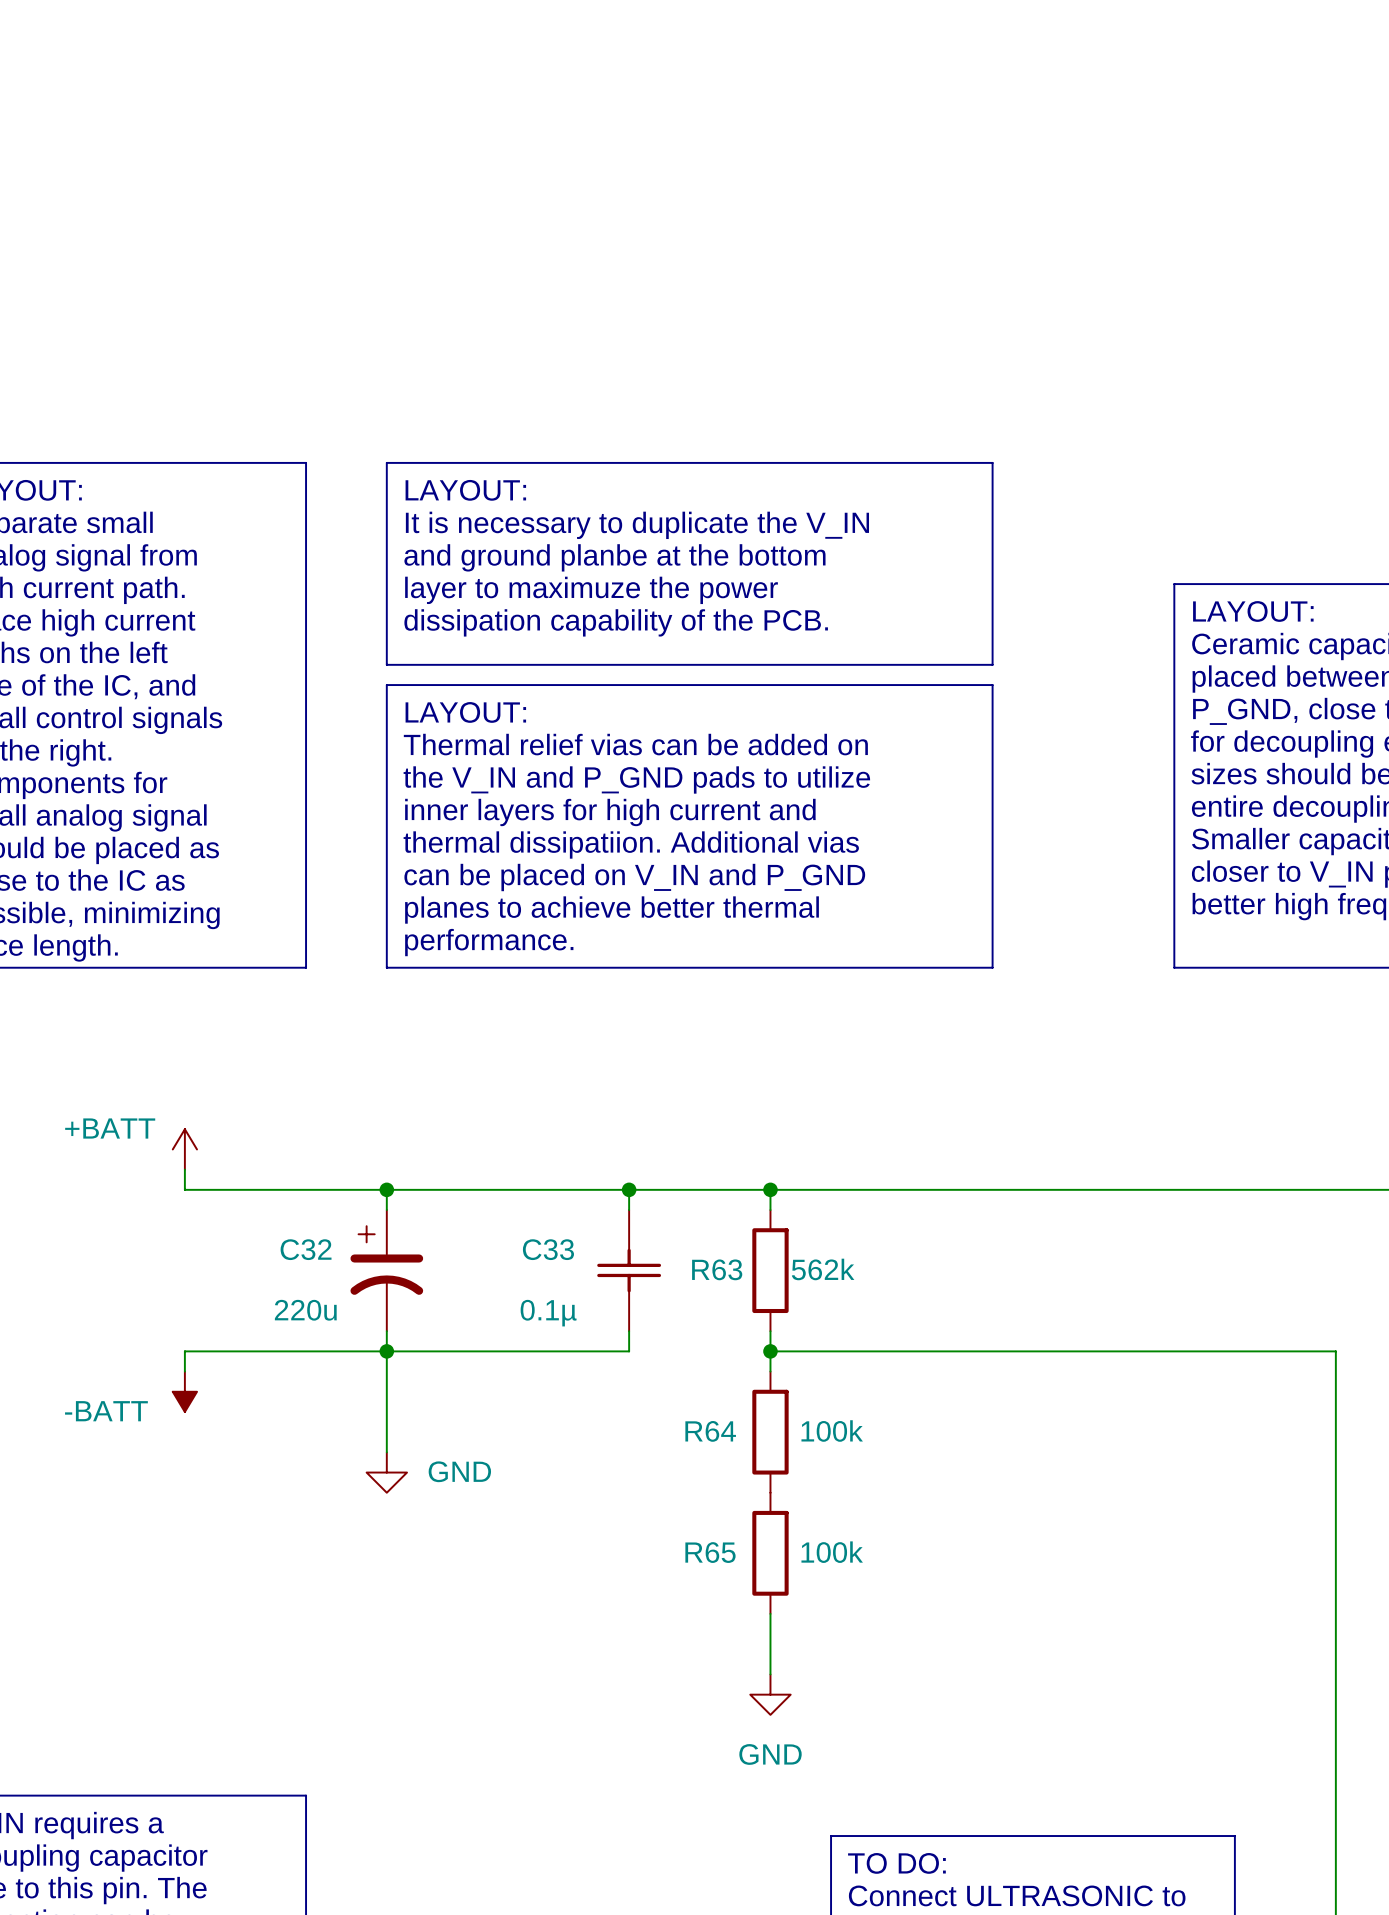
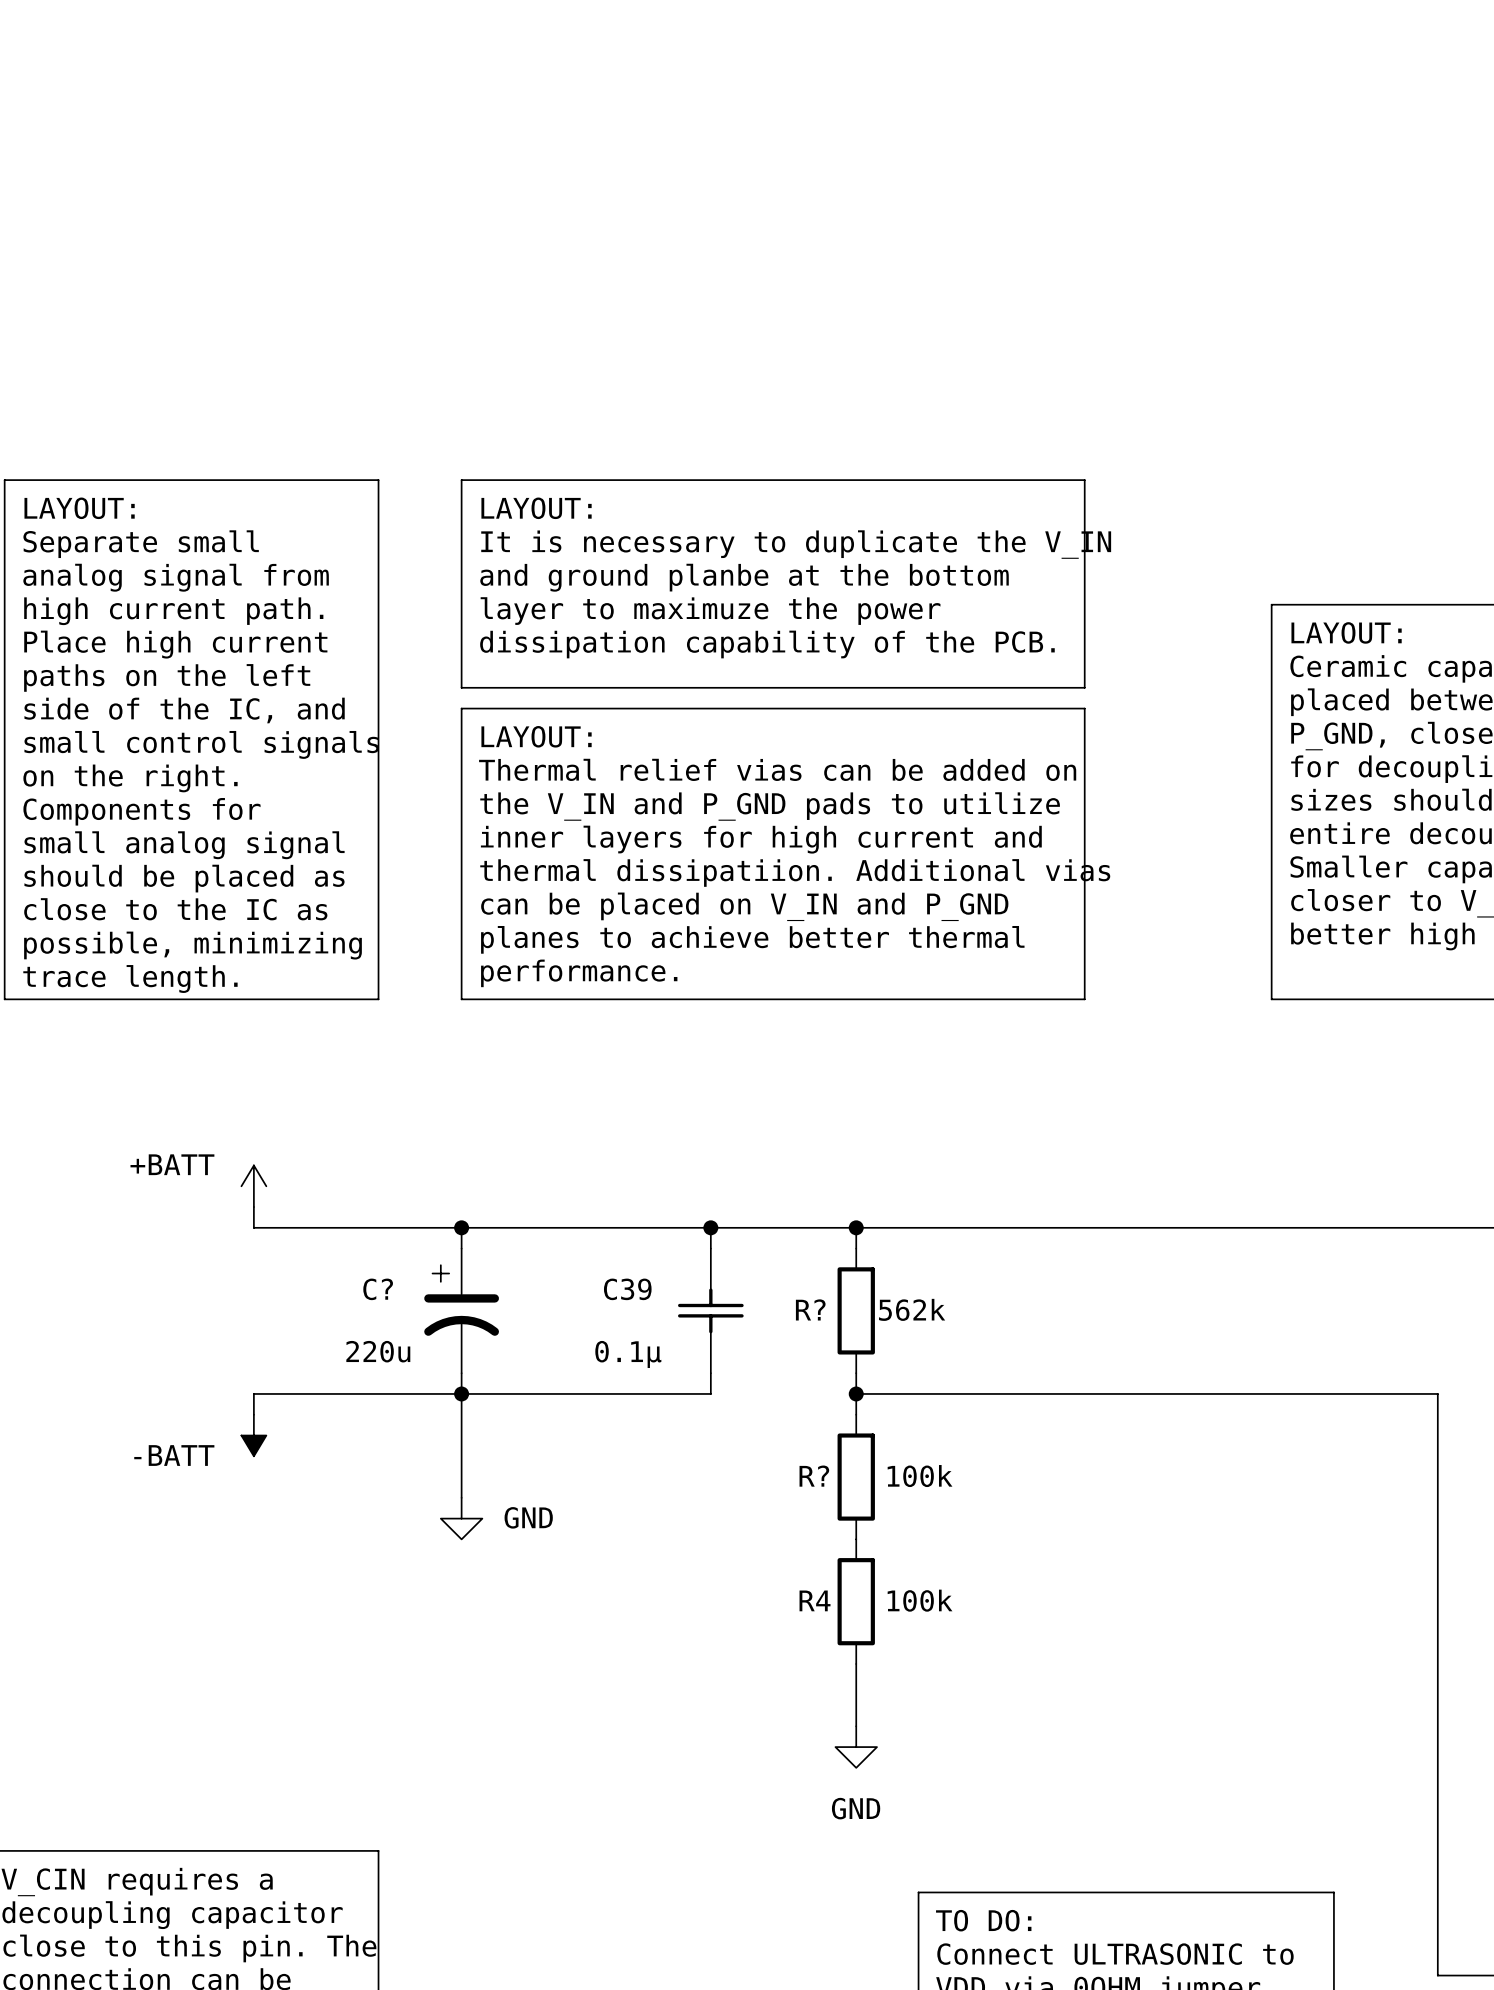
C32 name: C32 (306, 1249) -> C? (378, 1289)
C33 name: C33 (548, 1249) -> C39 (627, 1289)
R63 name: R63 (717, 1269) -> R? (810, 1309)
R64 name: R64 (710, 1431) -> R? (814, 1476)
R65 name: R65 (710, 1552) -> R4 (815, 1600)

